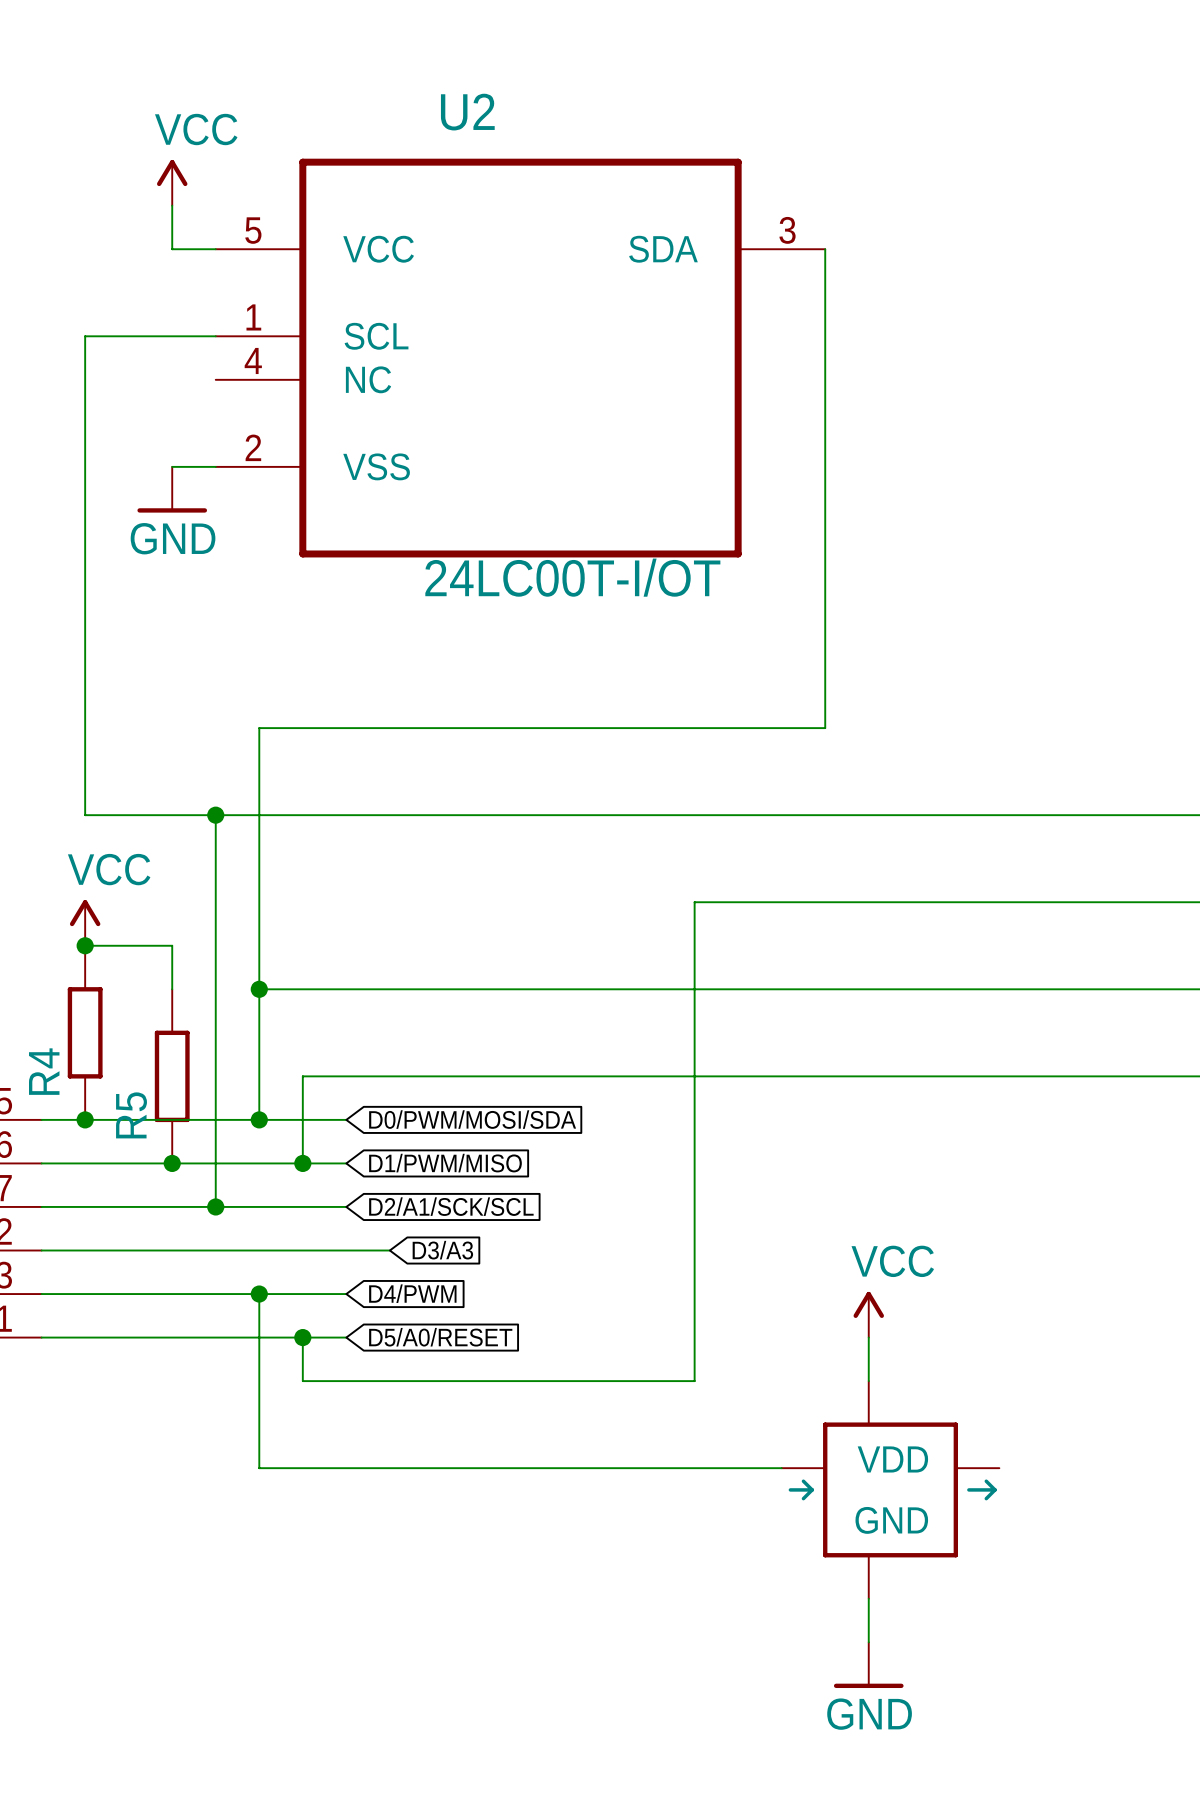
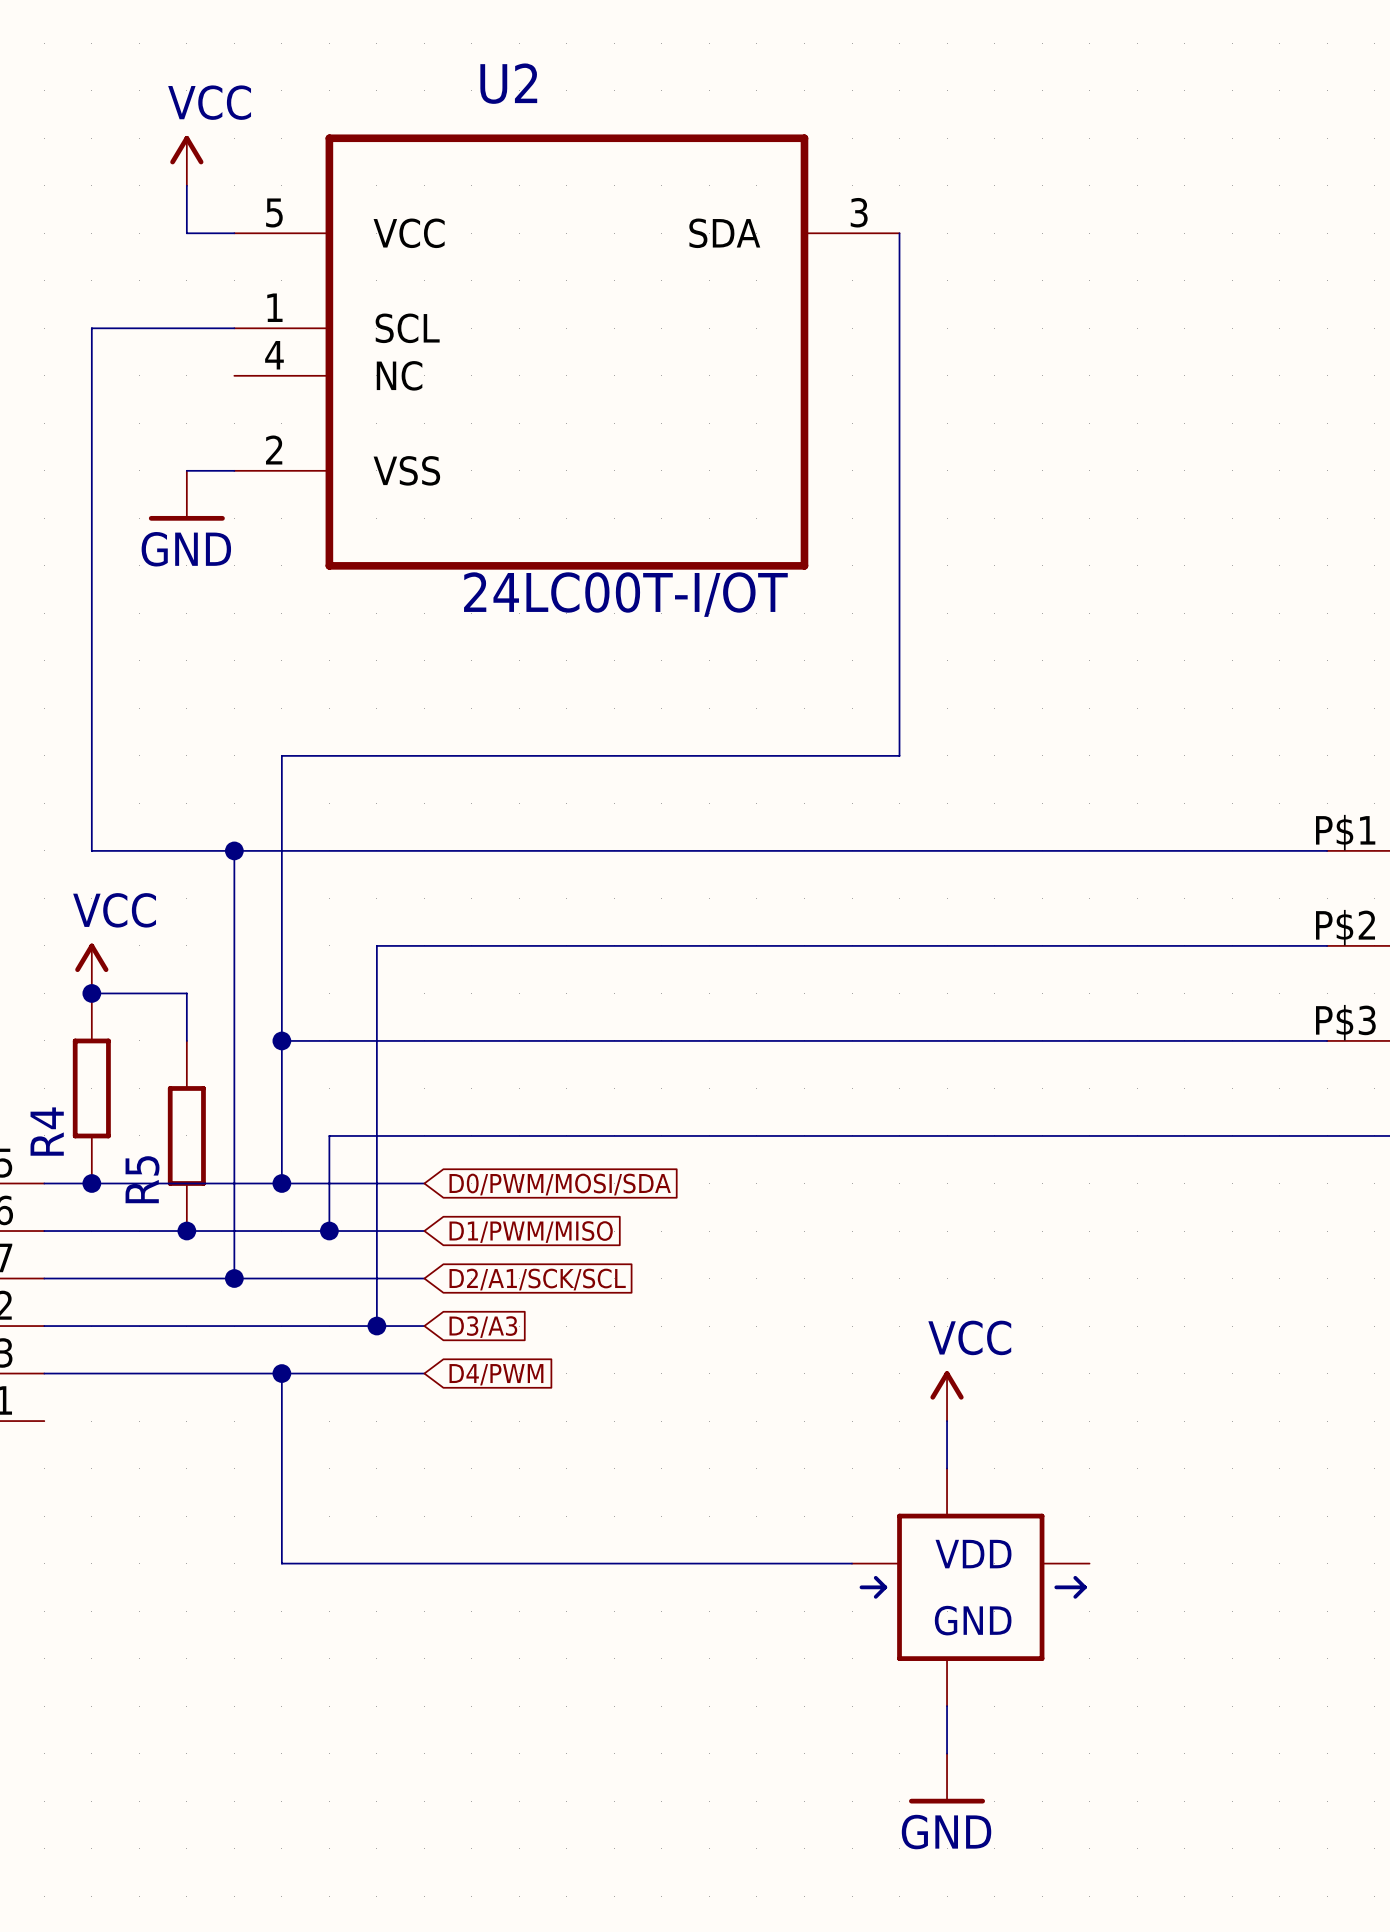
wire: (694, 902) (694, 1381) (302, 1381) (302, 1337) -> (756, 945) (376, 945) (376, 1326)
wire: none -> (376, 1183) (424, 1183)
global label position: D0/PWM/MOSI/SDA (472, 1119) -> D0/PWM/MOSI/SDA (560, 1184)
wire: none -> (376, 1231) (424, 1231)
global label position: D1/PWM/MISO (445, 1163) -> D1/PWM/MISO (531, 1232)
wire: none -> (376, 1278) (424, 1278)
global label position: D2/A1/SCK/SCL (451, 1206) -> D2/A1/SCK/SCL (537, 1279)
global label position: D4/PWM (412, 1293) -> D4/PWM (496, 1374)
wire: none -> (376, 1373) (424, 1373)
wire: (41, 1337) (346, 1337) -> none
junction position: (302, 1337) -> (376, 1326)
global label: D5/A0/RESET (440, 1337) -> none

